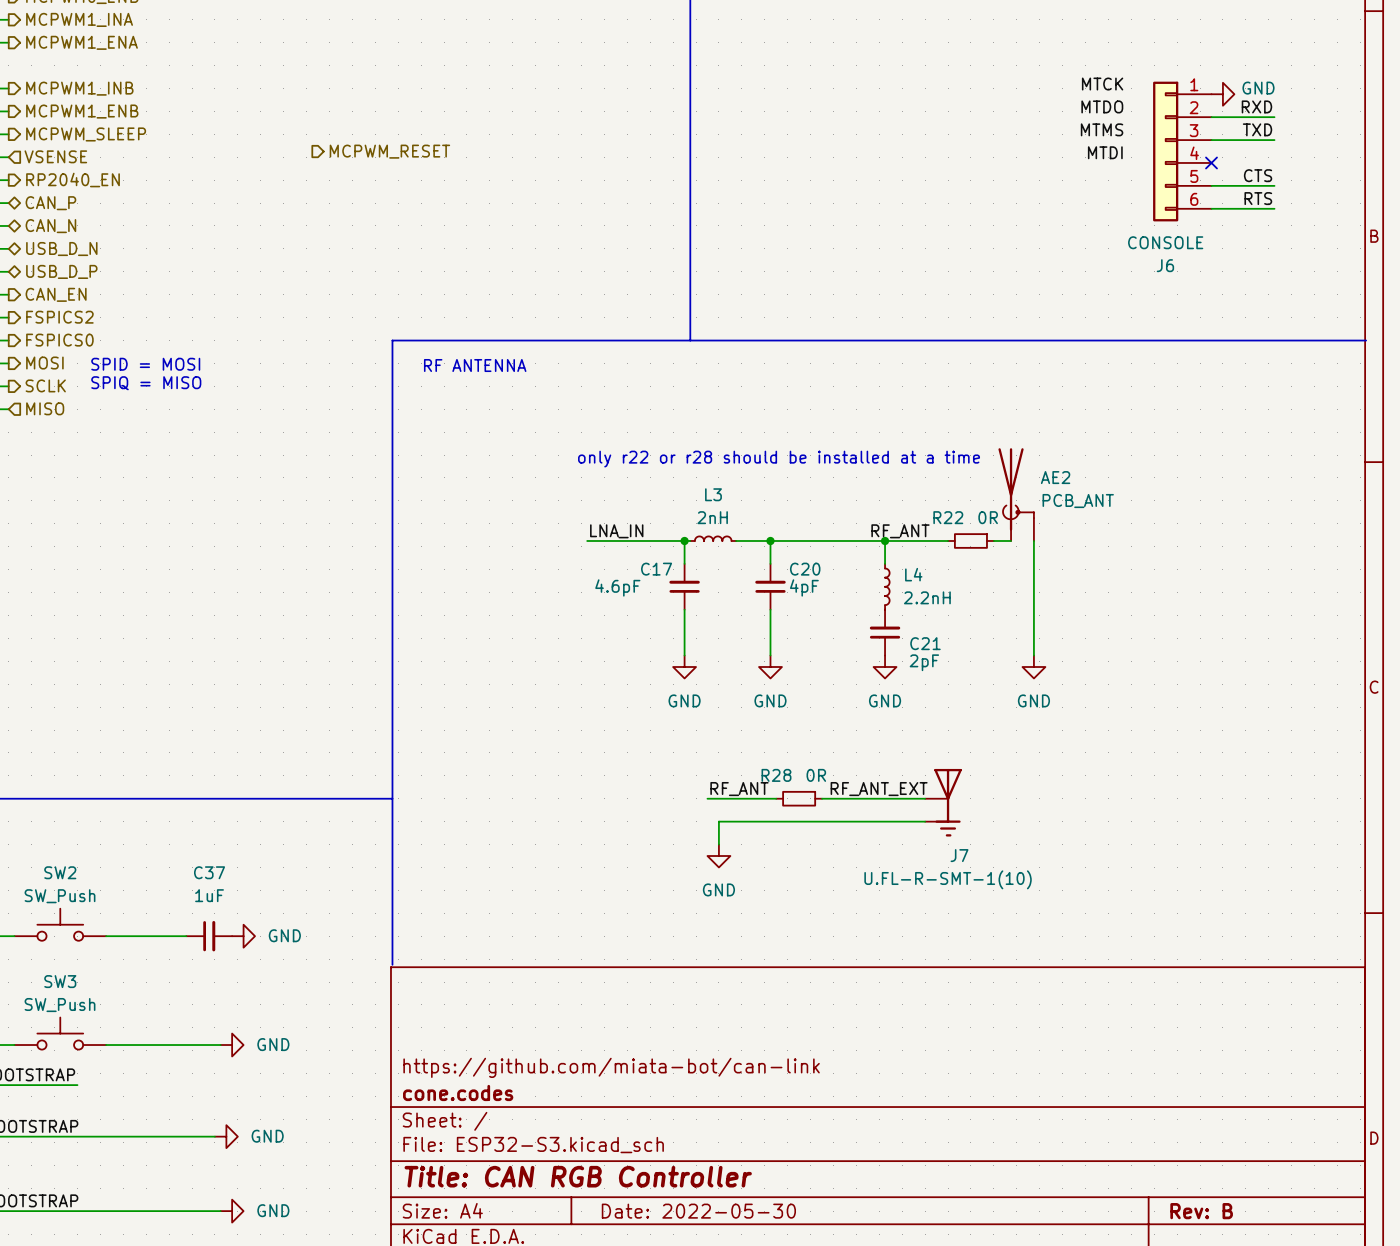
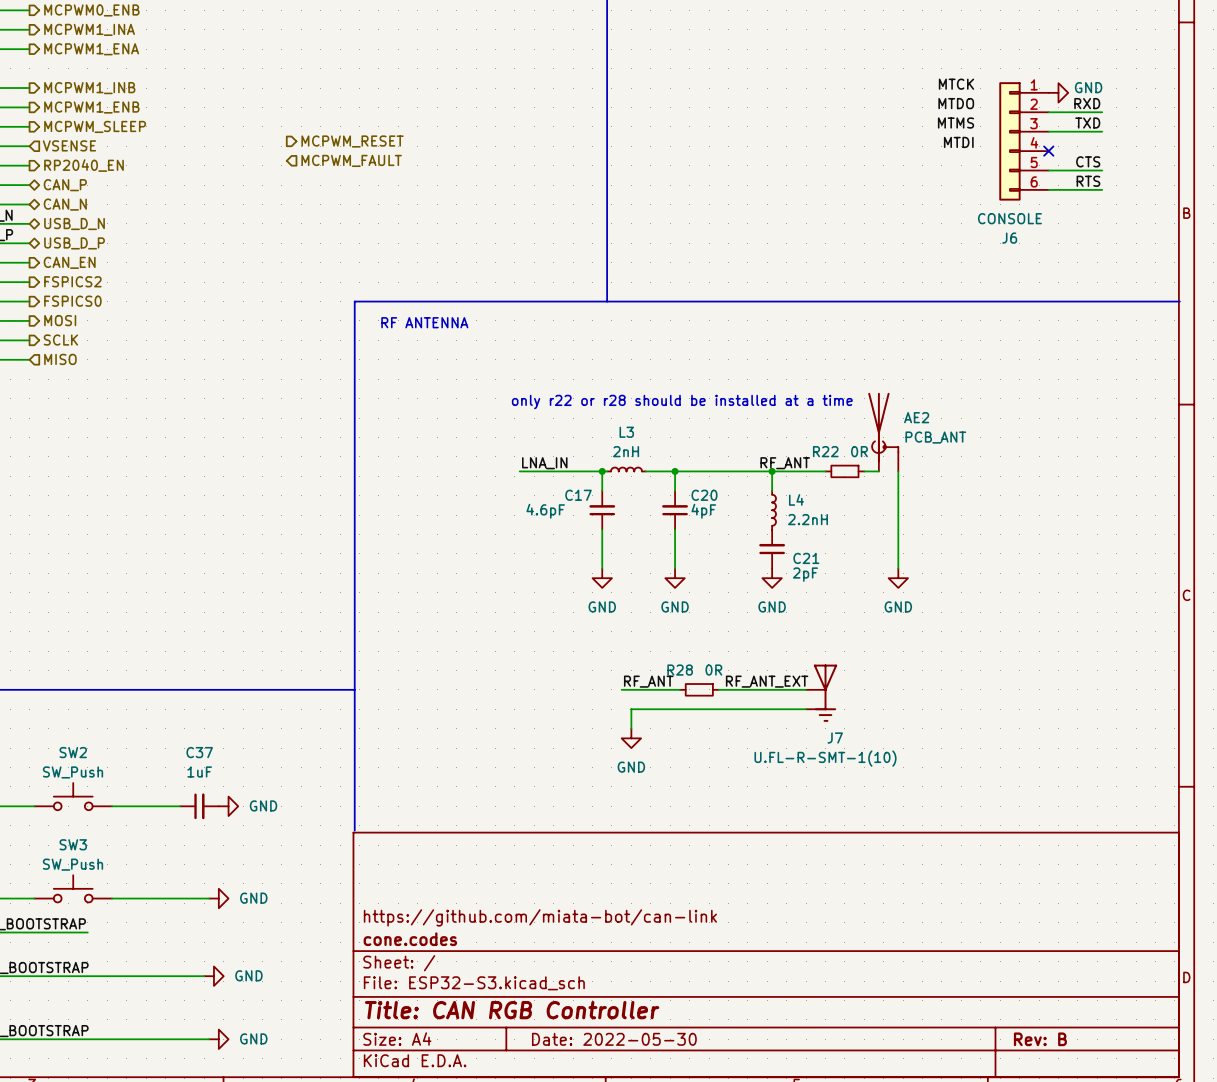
hierarchical label: none -> MCPWM_FAULT (351, 160)
text: SPID = MOSI (145, 364) -> none
text: SPIQ = MISO (146, 383) -> none

